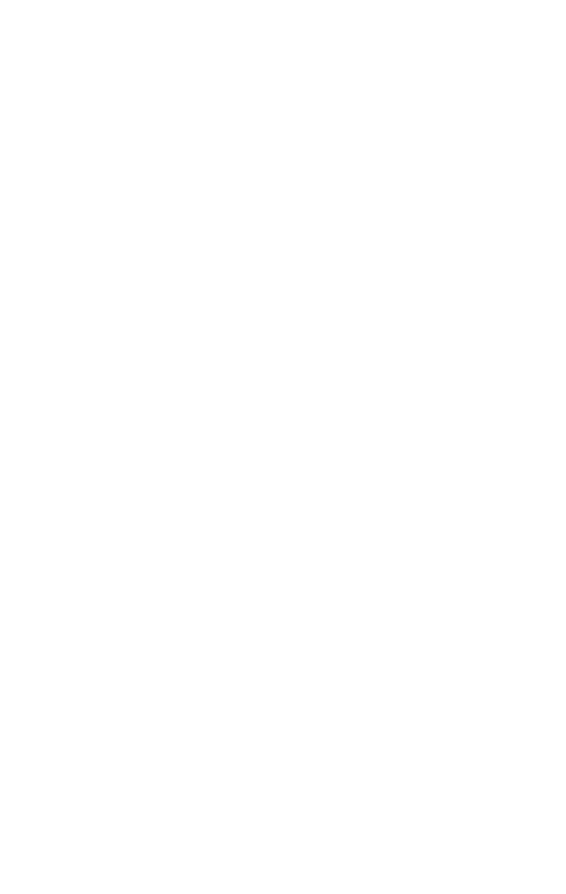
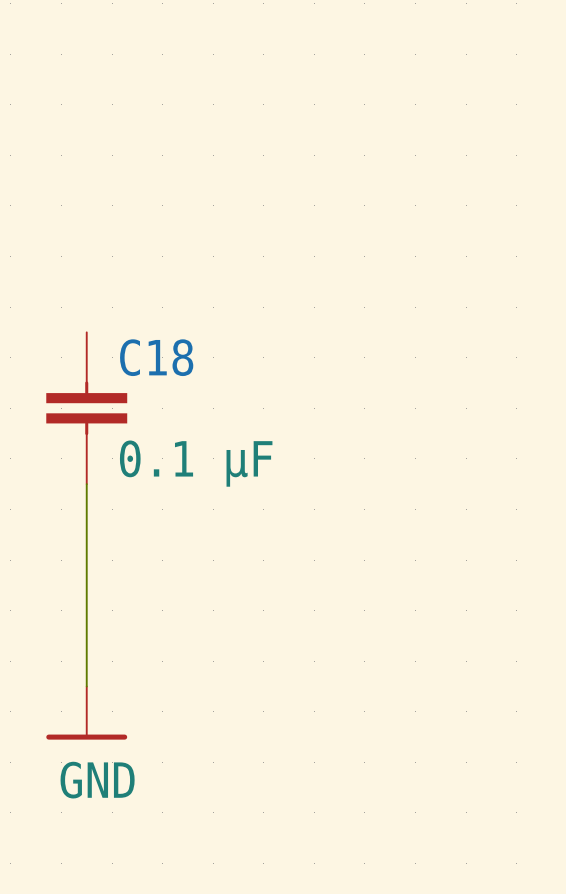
C18: none -> 0.1 µF (86, 408)
wire: none -> (86, 484) (86, 686)
power symbol: none -> GND (86, 713)

